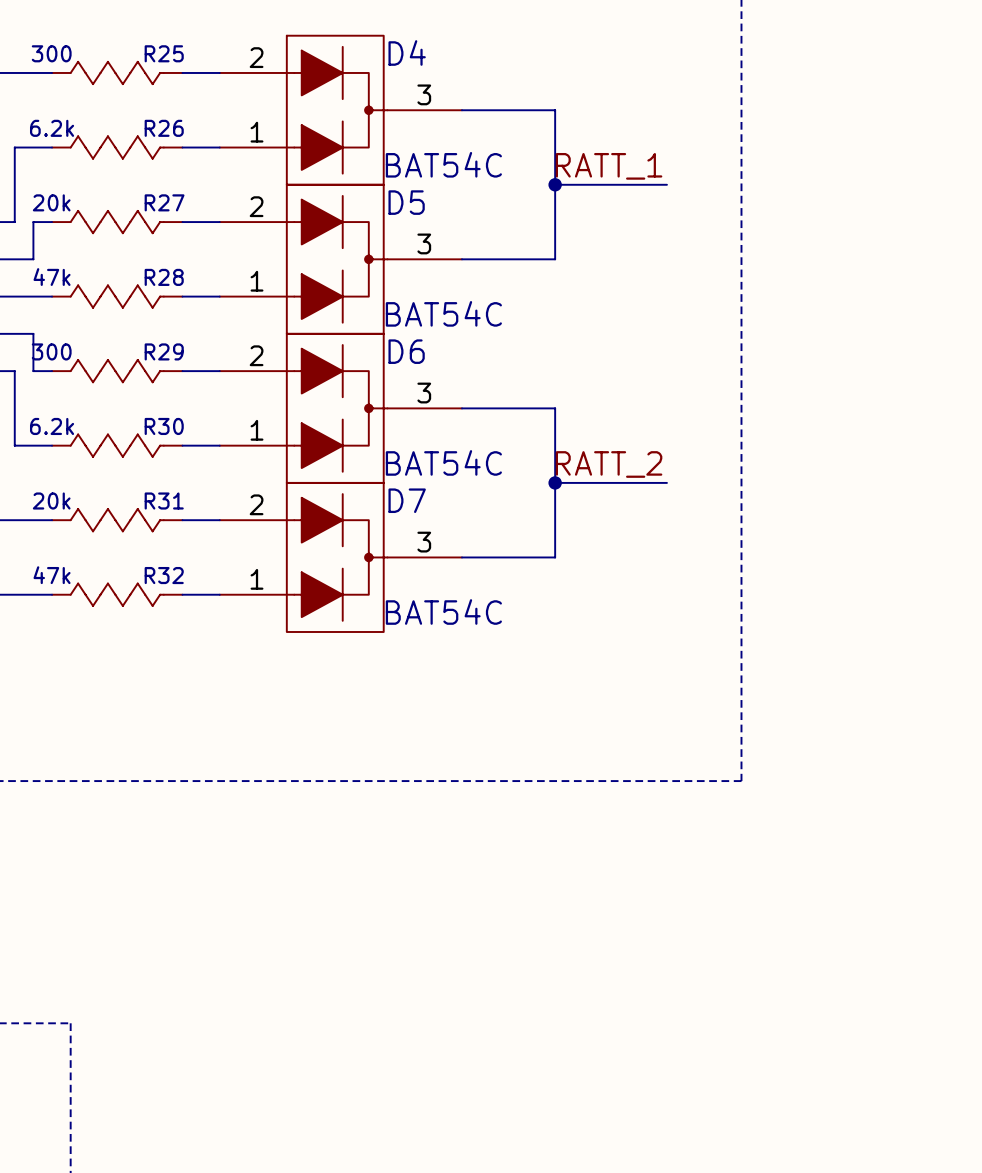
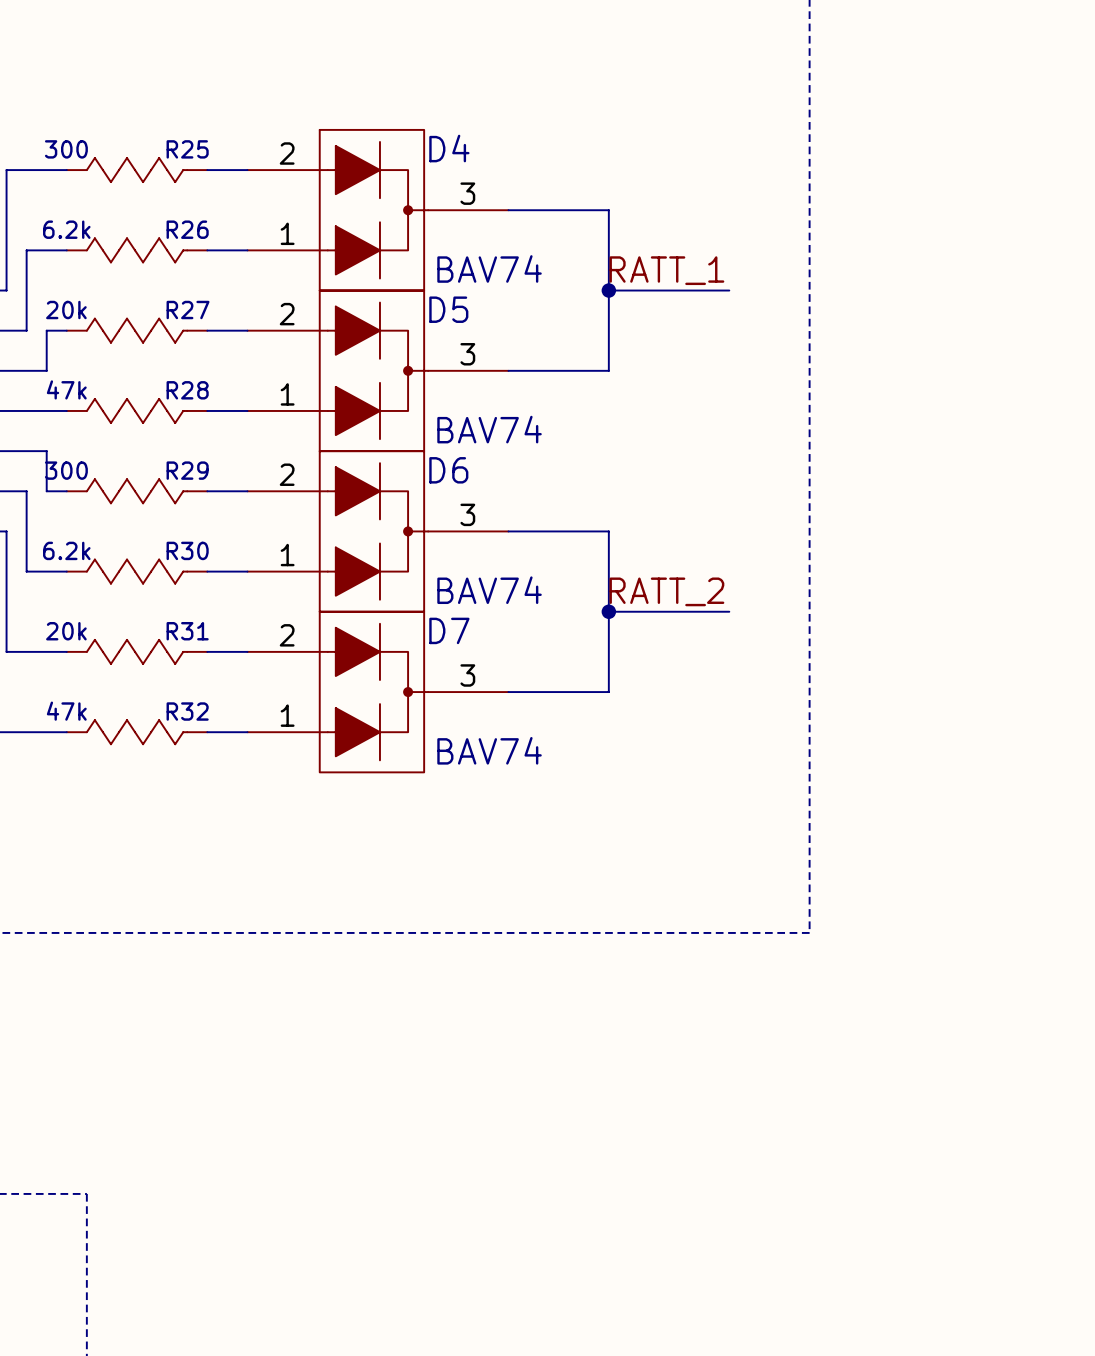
D4 value: BAT54C (443, 164) -> BAV74 (489, 268)
D5 value: BAT54C (443, 313) -> BAV74 (489, 429)
D6 value: BAT54C (443, 462) -> BAV74 (489, 590)
D7 value: BAT54C (443, 611) -> BAV74 (489, 750)

